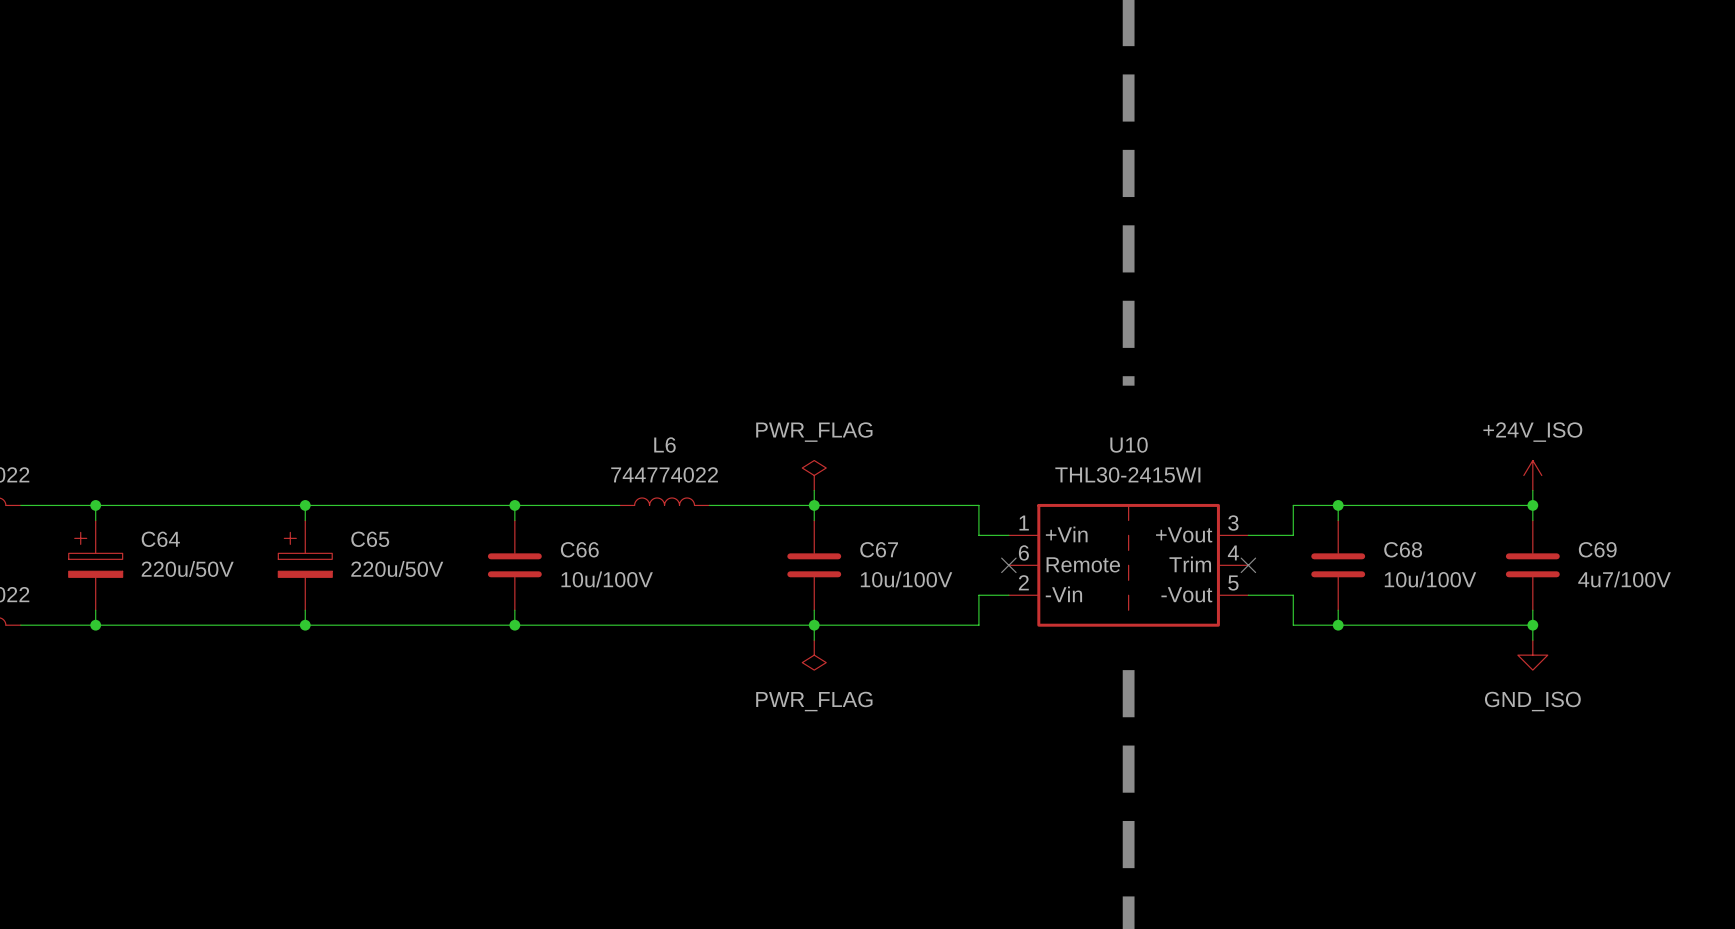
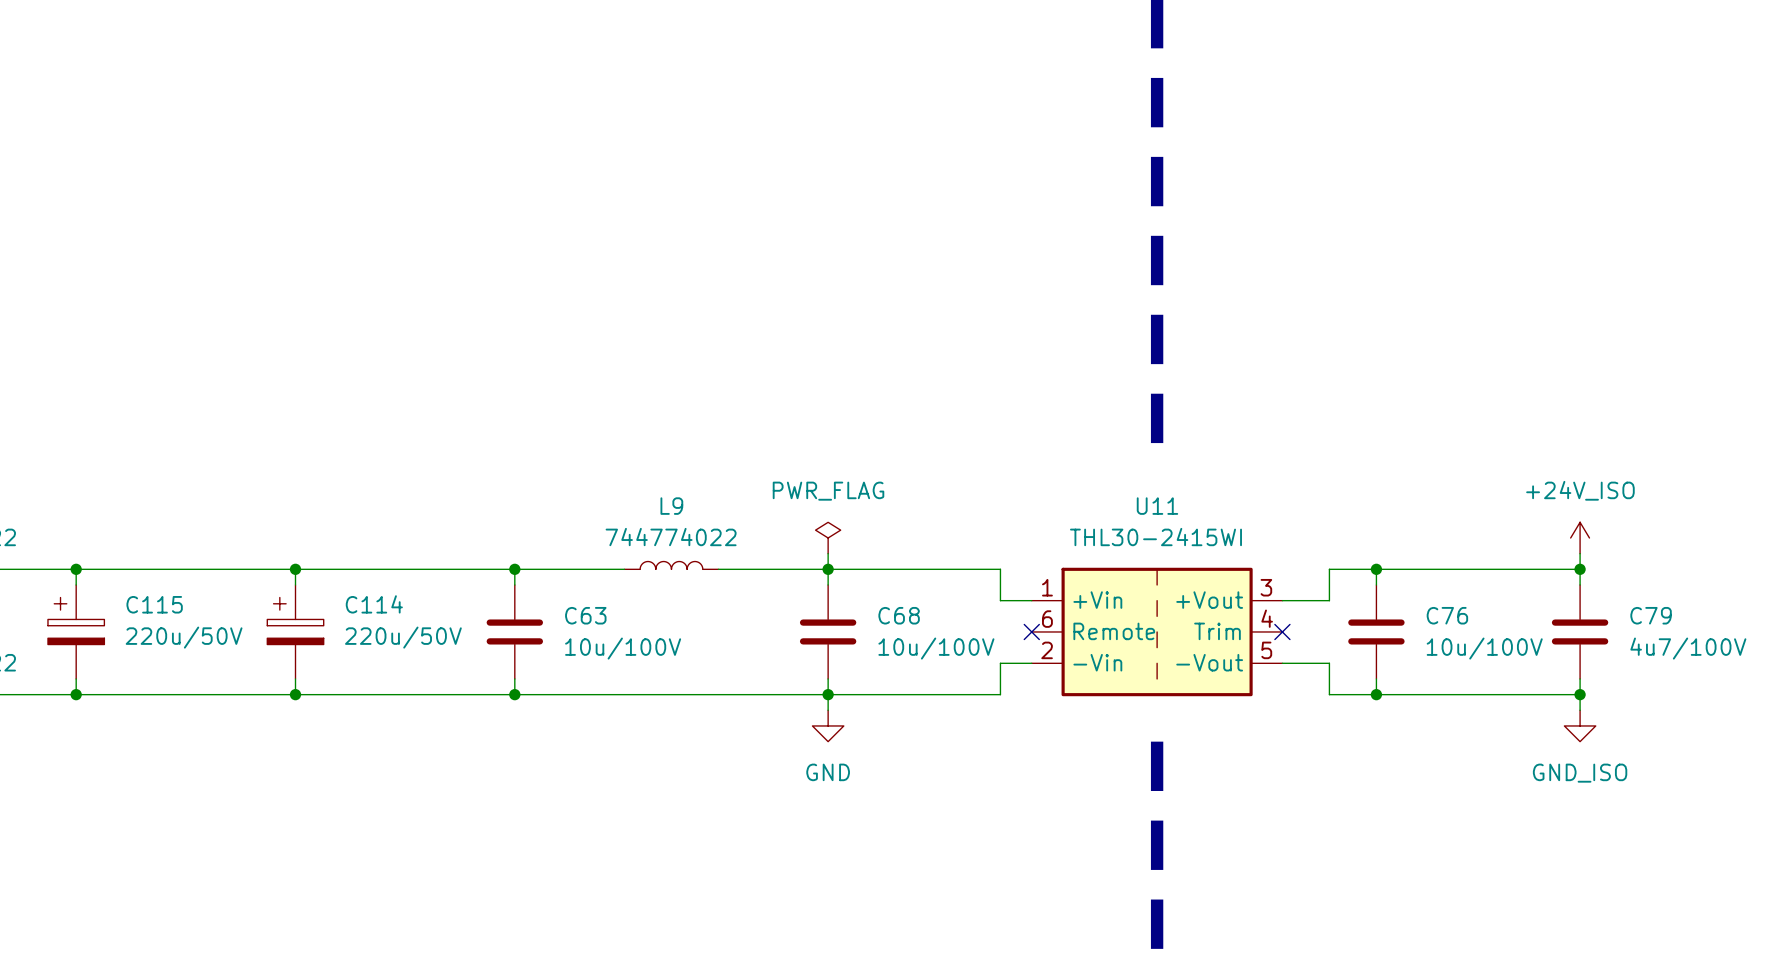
L6 name: L6 (664, 444) -> L9 (671, 506)
U10 name: U10 (1129, 444) -> U11 (1157, 506)
C64 name: C64 (160, 539) -> C115 (154, 604)
C65 name: C65 (370, 539) -> C114 (374, 604)
C66 name: C66 (579, 549) -> C63 (585, 615)
C67 name: C67 (879, 549) -> C68 (899, 615)
C68 name: C68 (1403, 549) -> C76 (1447, 615)
C69 name: C69 (1597, 549) -> C79 (1651, 615)
power symbol: PWR_FLAG (814, 655) -> GND (828, 725)

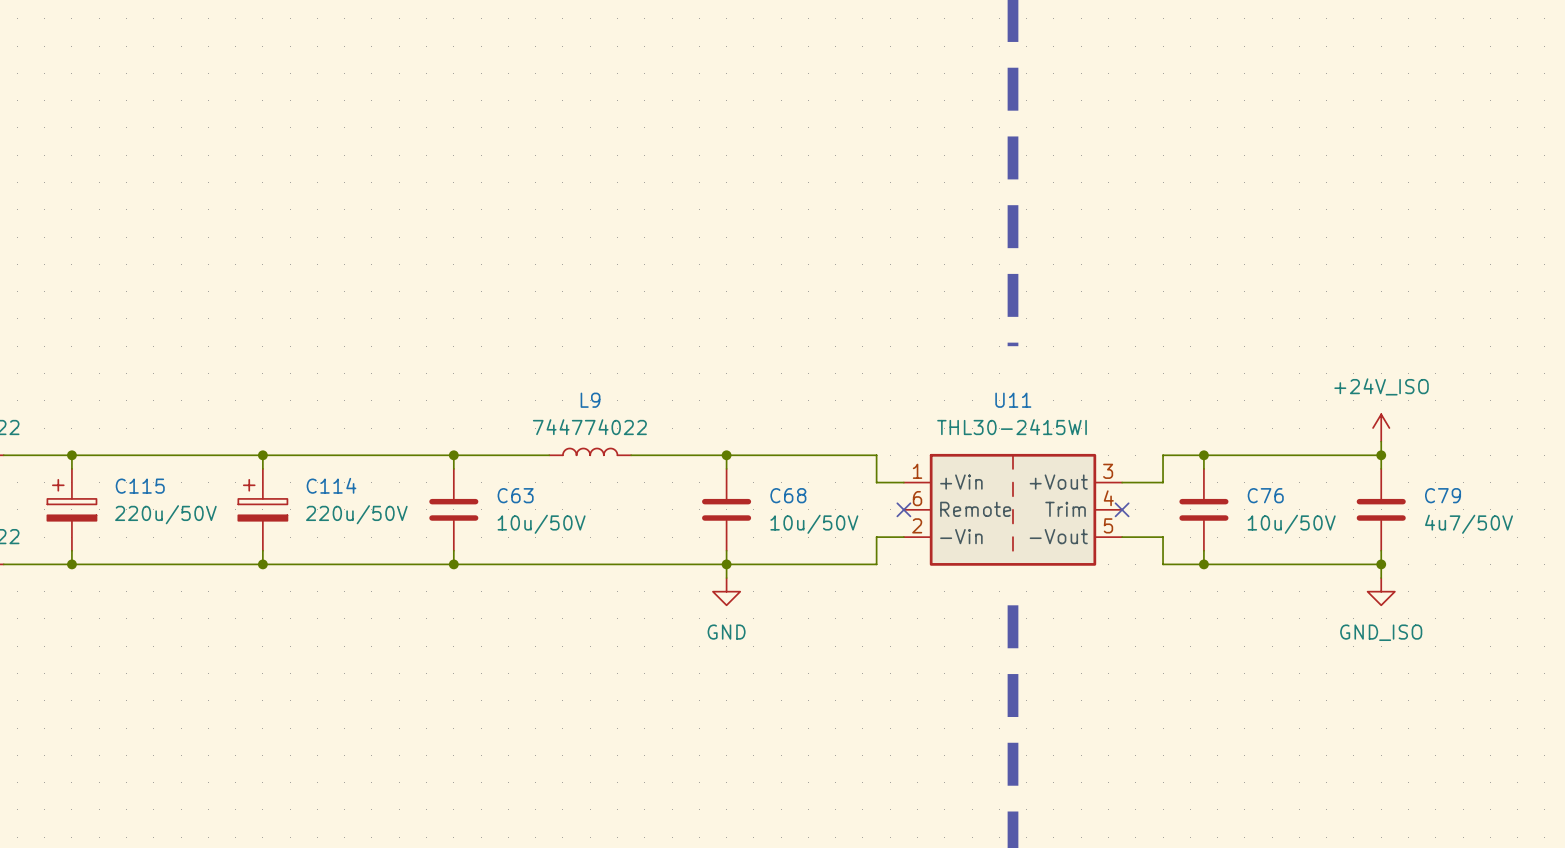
power symbol: PWR_FLAG (828, 537) -> none
wire: (828, 553) (828, 569) -> none
C63 value: 10u/100V (623, 648) -> 10u/50V (541, 524)
C68 value: 10u/100V (936, 648) -> 10u/50V (814, 524)
C76 value: 10u/100V (1484, 648) -> 10u/50V (1291, 524)
C79 value: 4u7/100V (1688, 648) -> 4u7/50V (1469, 524)

